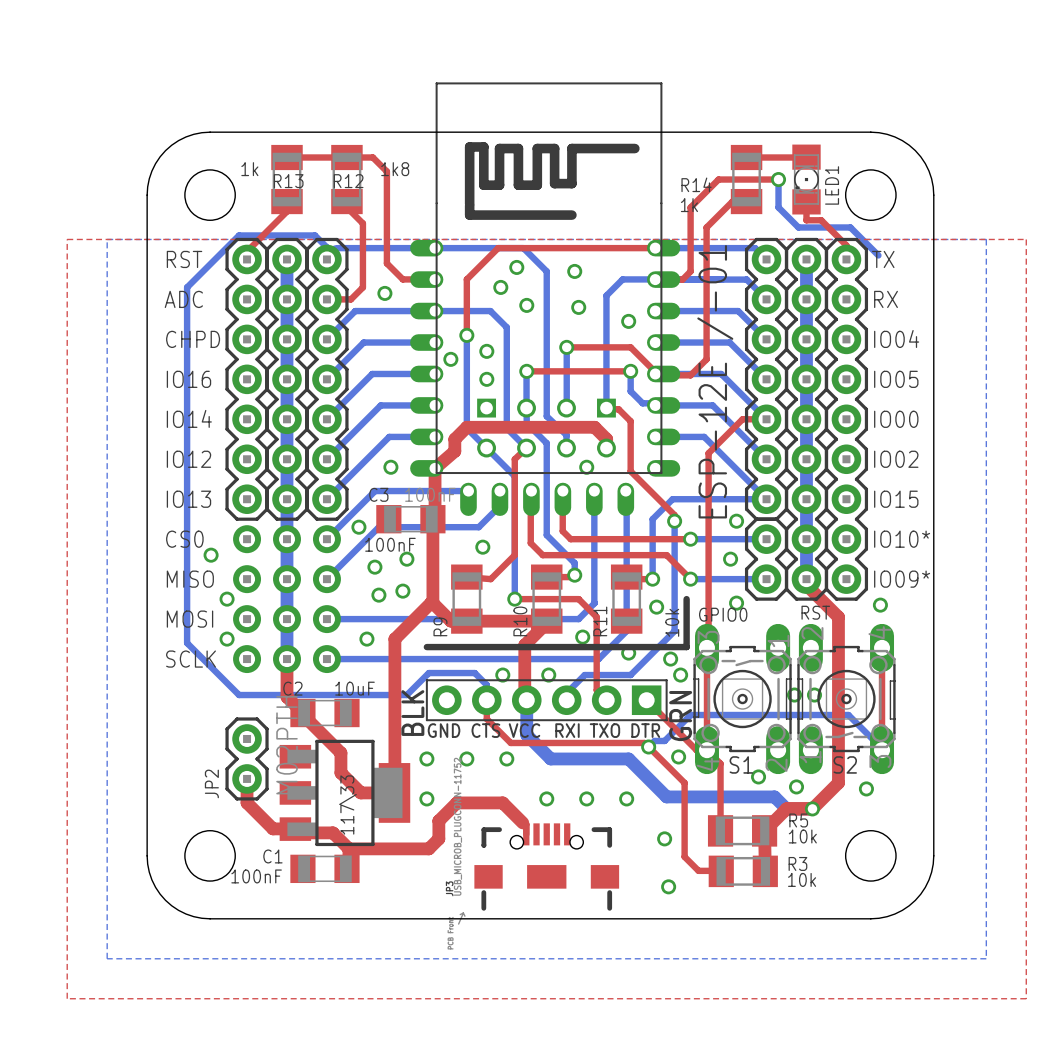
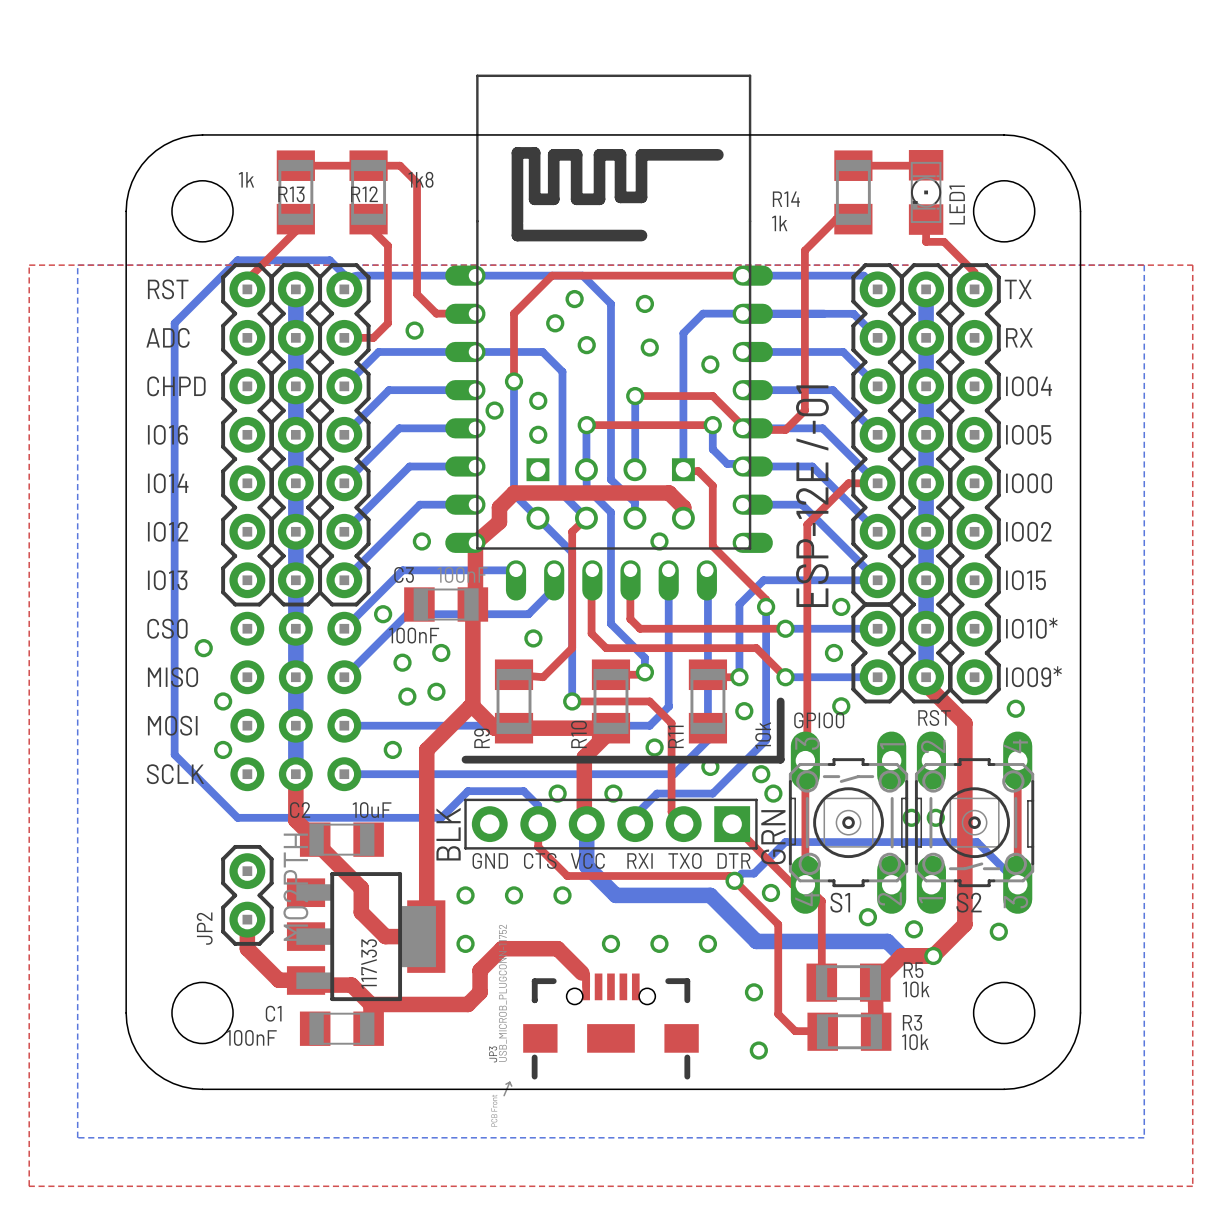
top track: (778, 179) (718, 179) (690, 207) (690, 271) (682, 279) (655, 279) -> none
bottom track: (778, 179) (778, 207) (798, 227) (850, 227) (878, 255) -> none
via: (778, 179) -> none

